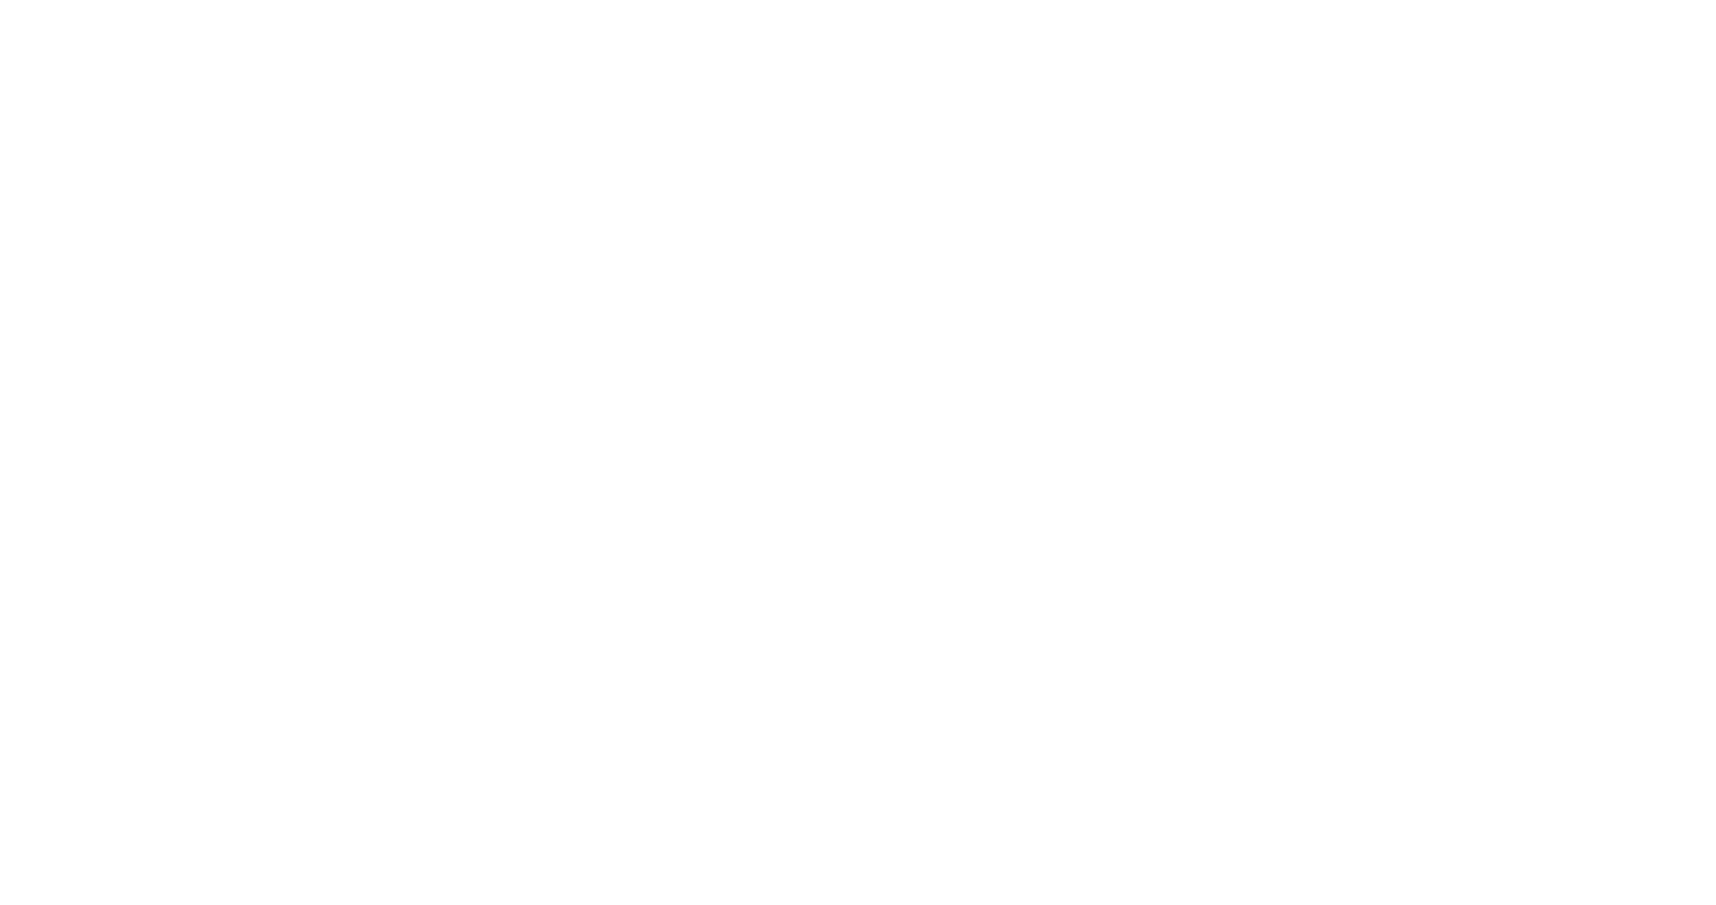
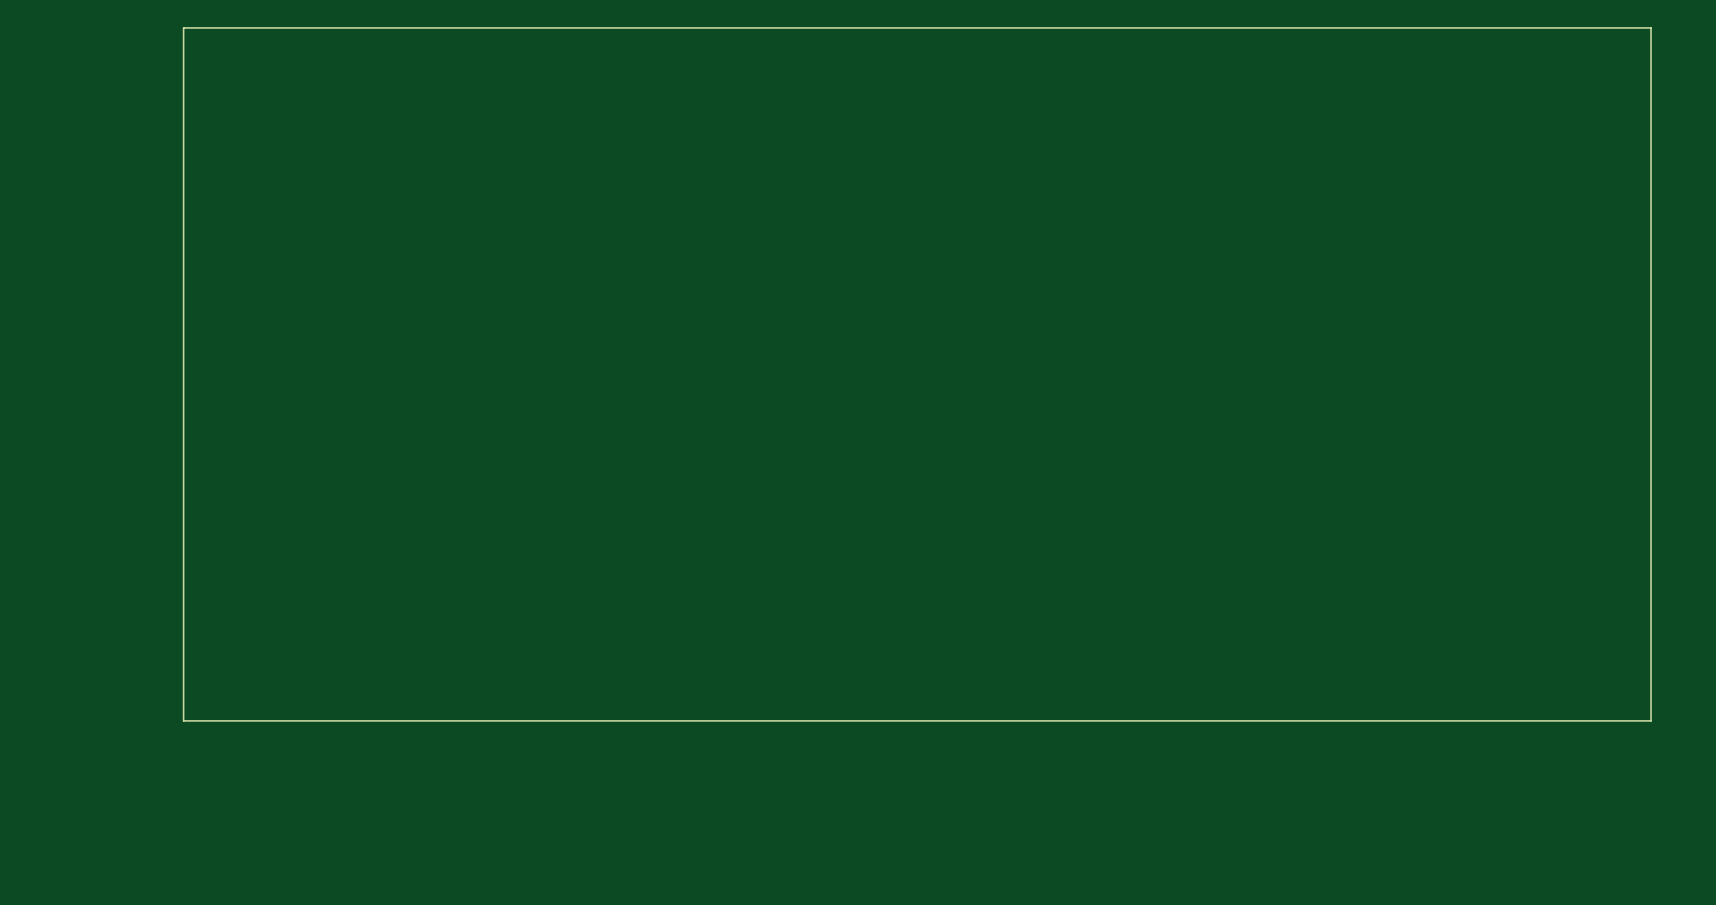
board edge: none -> (183, 27) (183, 720) (1651, 720) (1651, 27) (183, 27)

